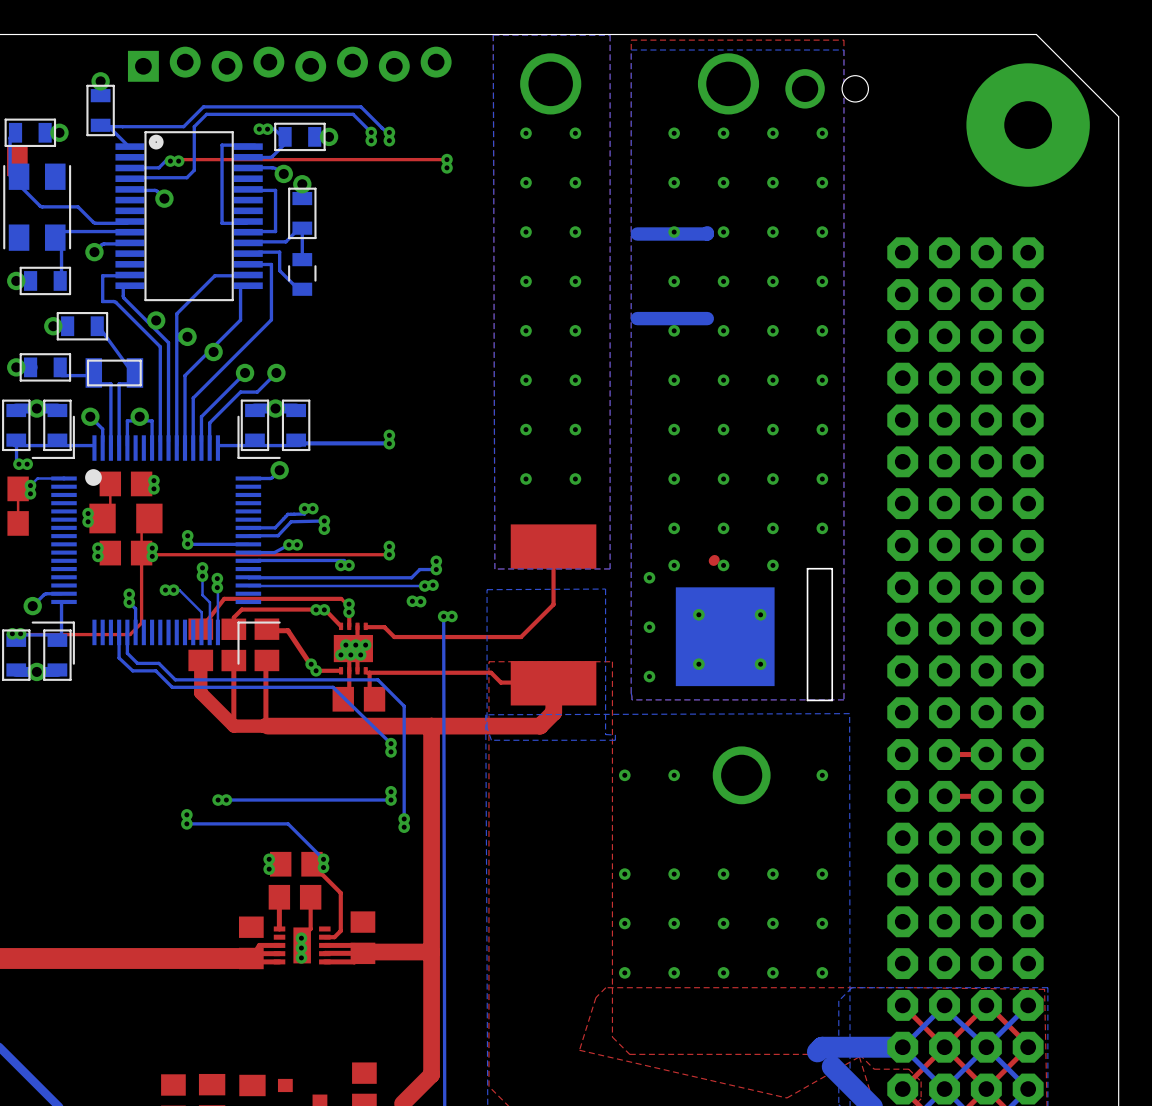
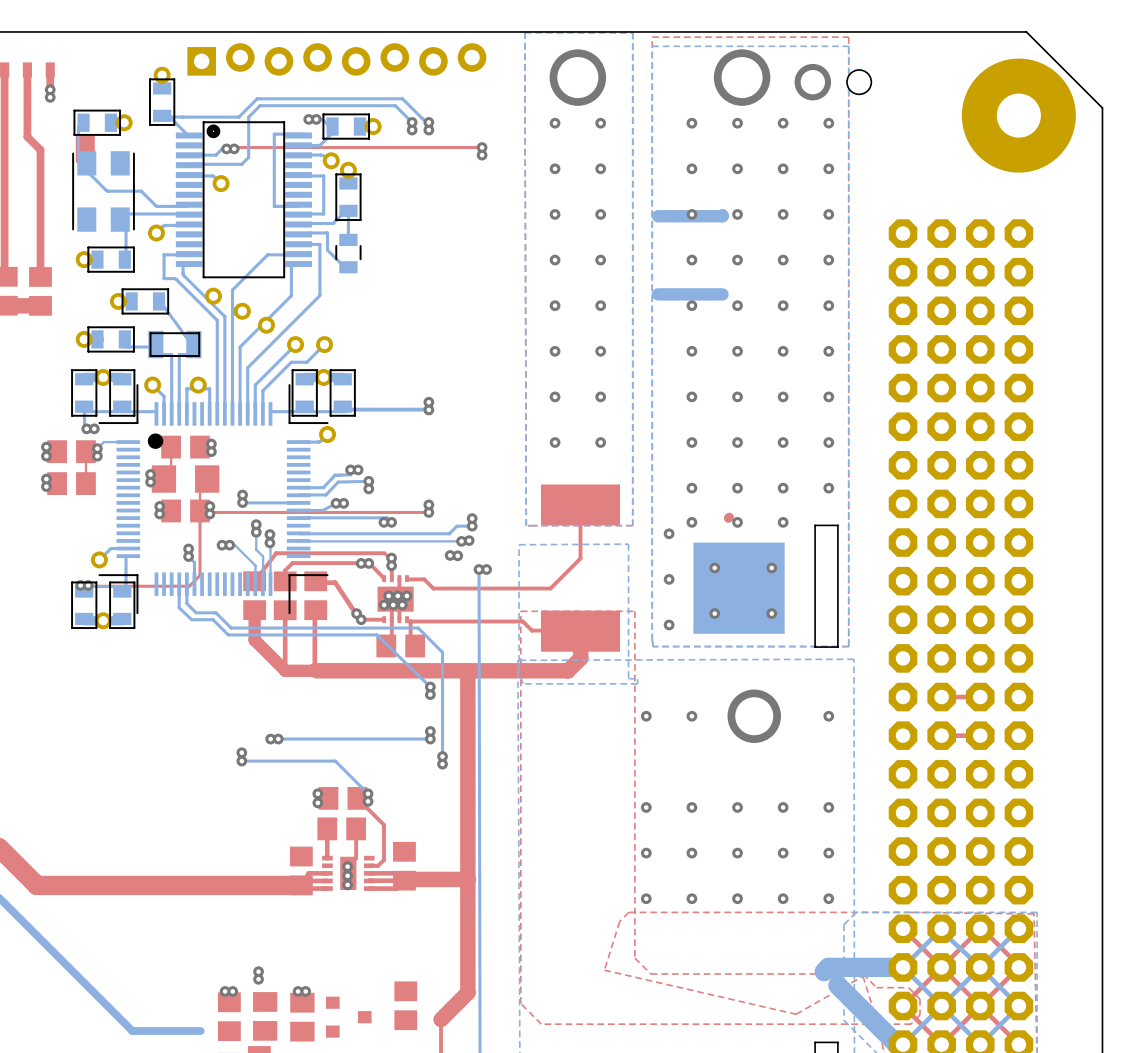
via: none -> (258, 971)
via: none -> (258, 979)
via: none -> (225, 991)
via: none -> (232, 991)
via: none -> (298, 991)
via: none -> (305, 991)

